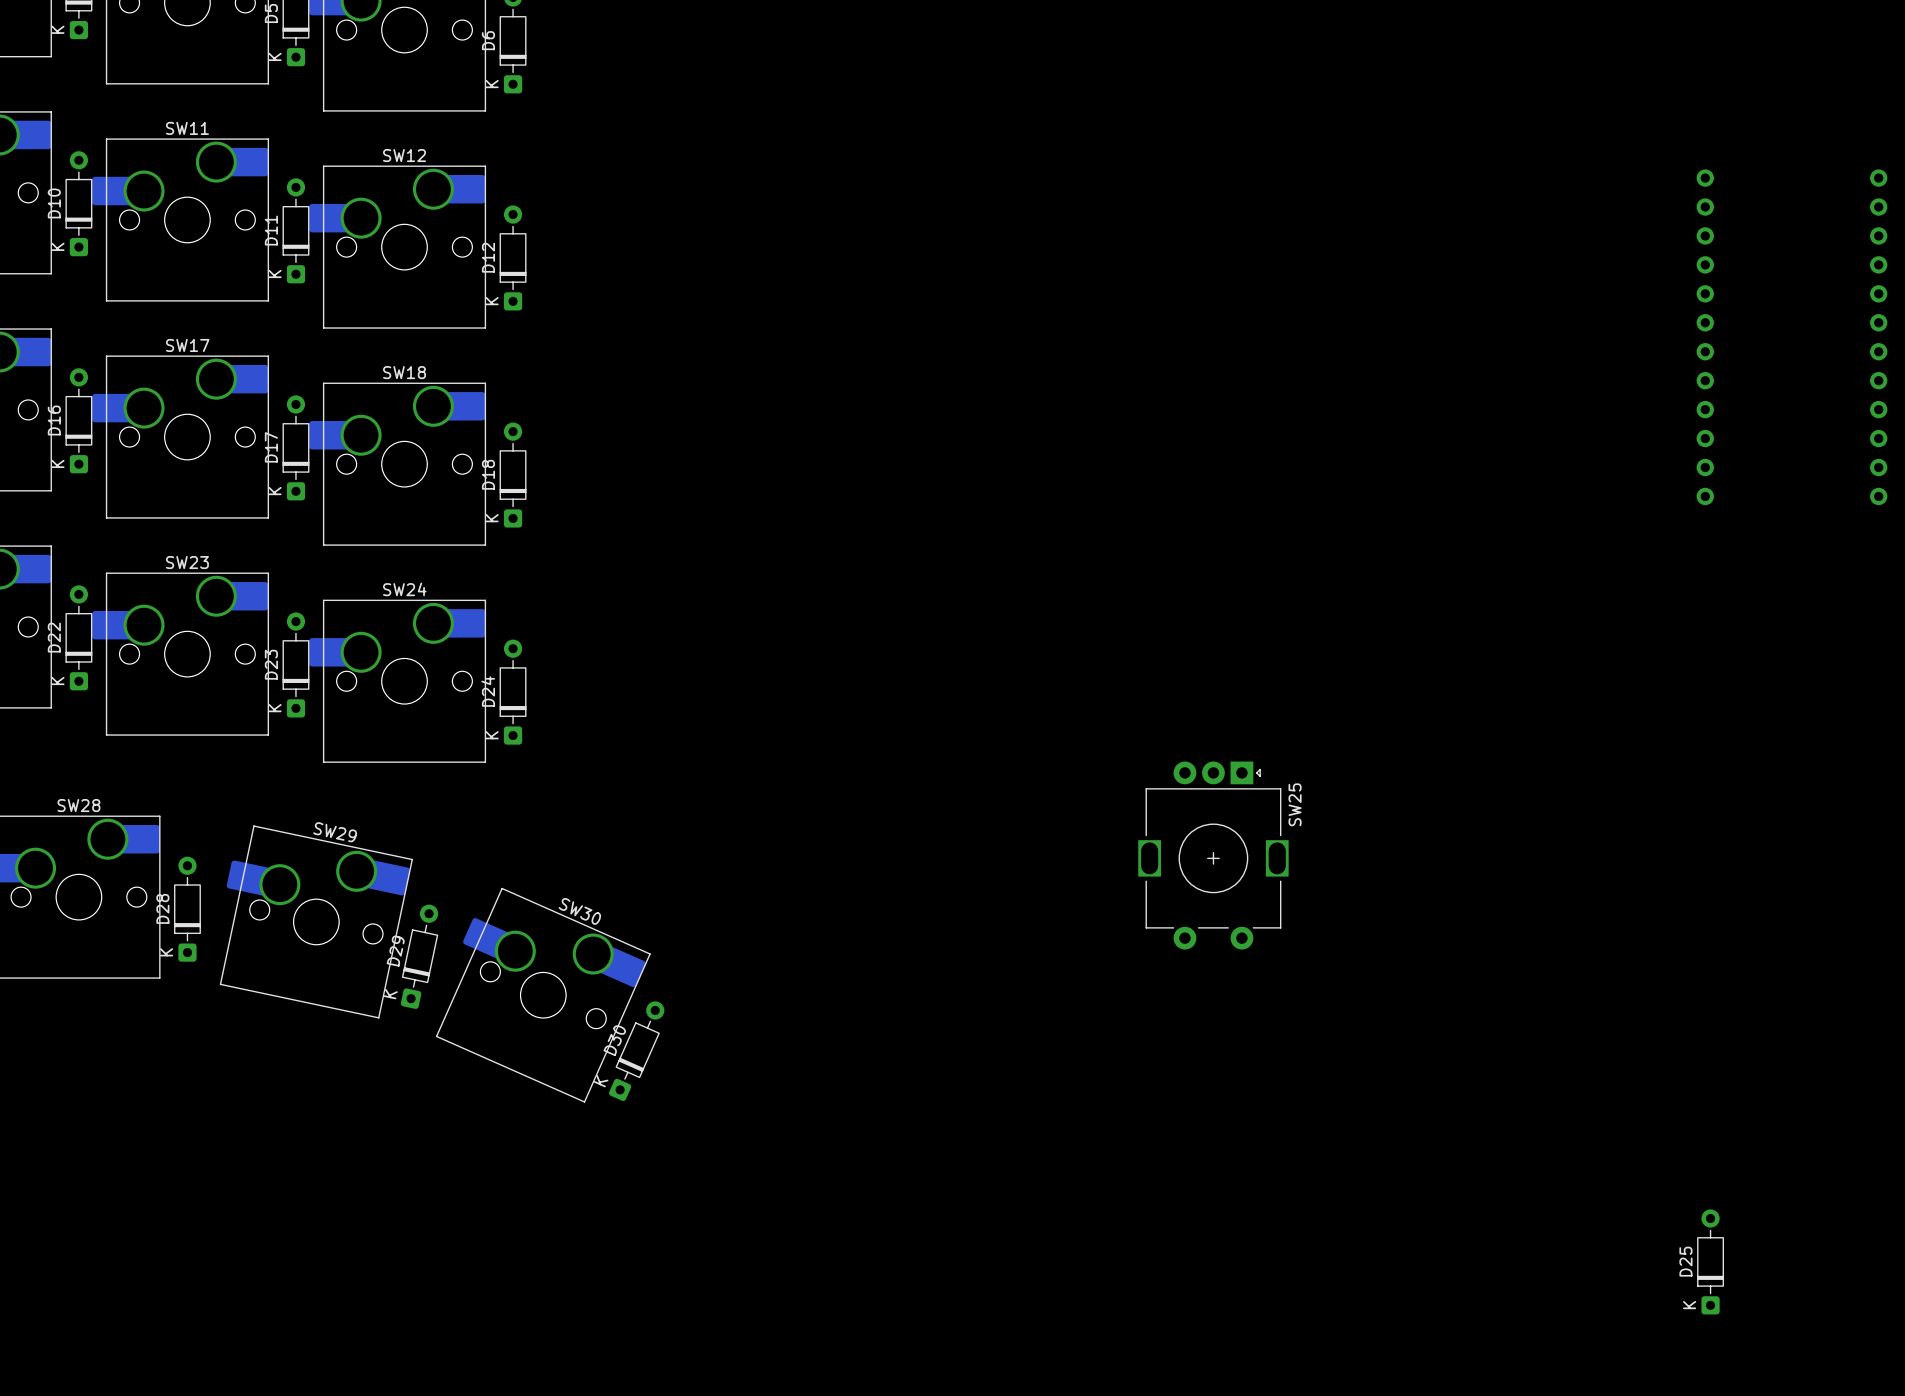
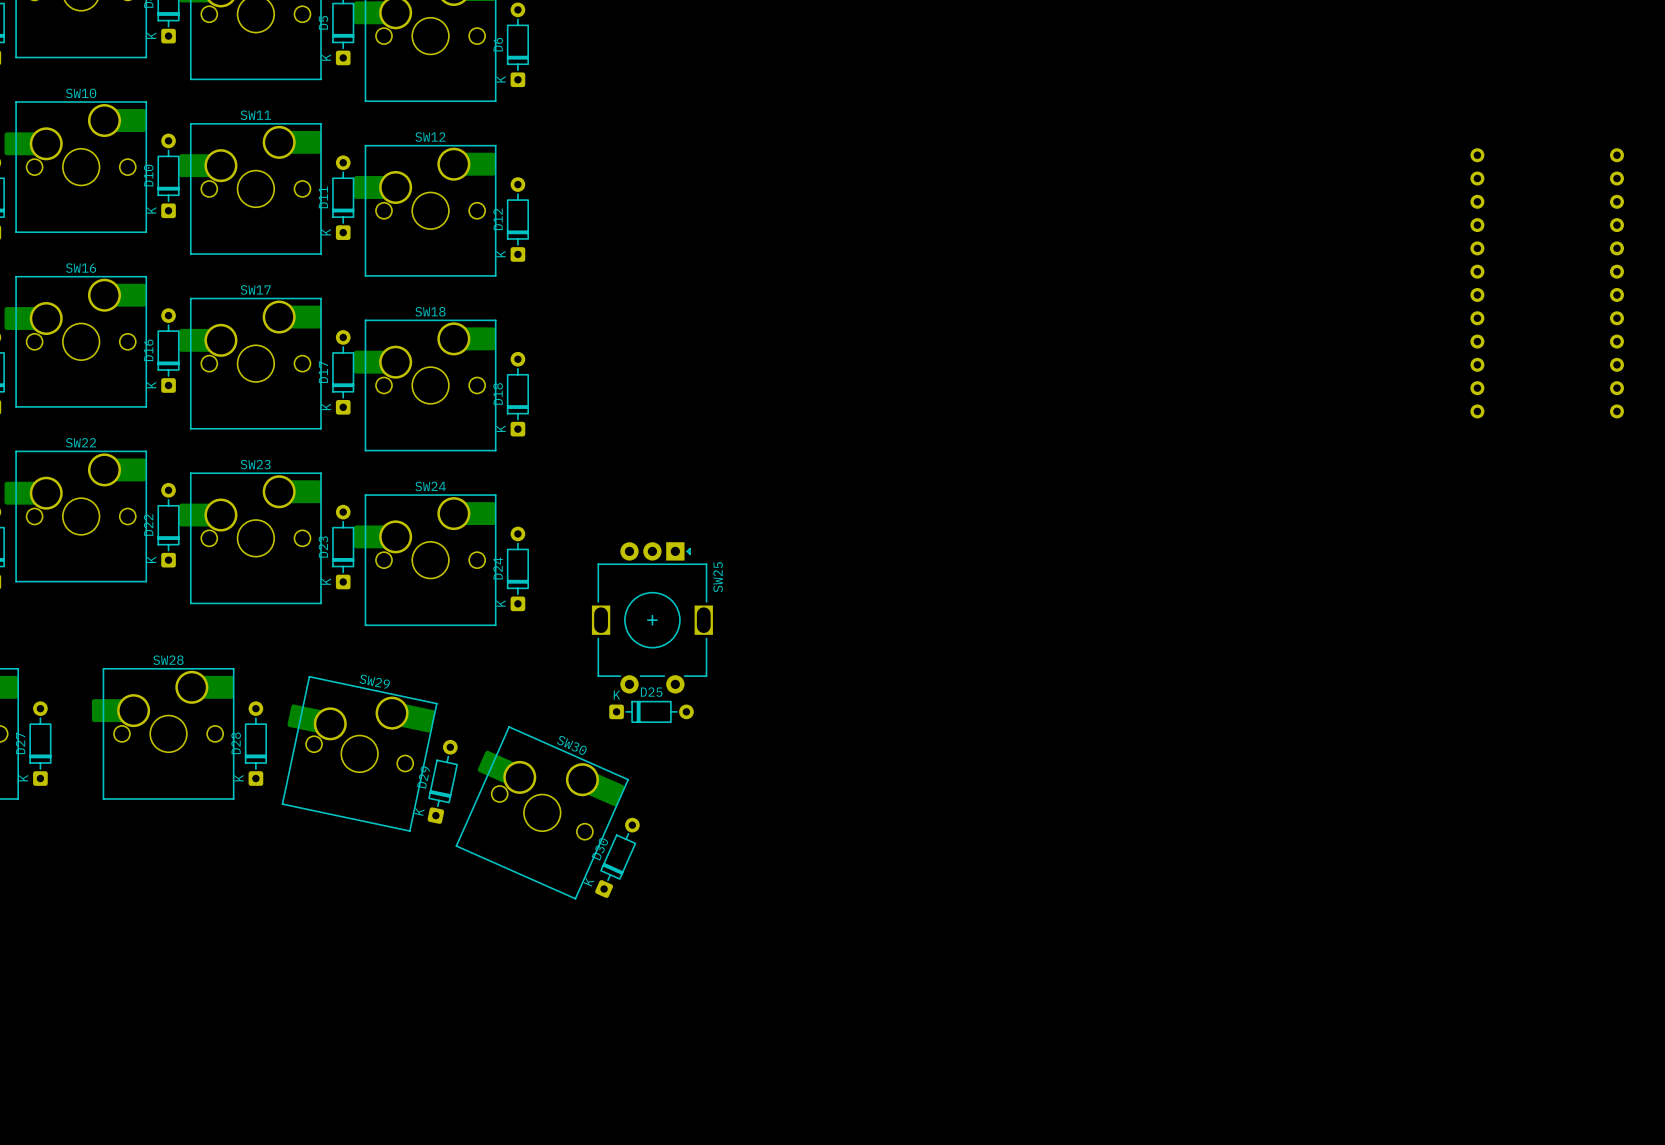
SW25 position: (1213, 855) -> (652, 617)
D25 rotation: 0° (1710, 1261) -> 90° clockwise (651, 711)
D25 position: (1710, 1261) -> (651, 711)

